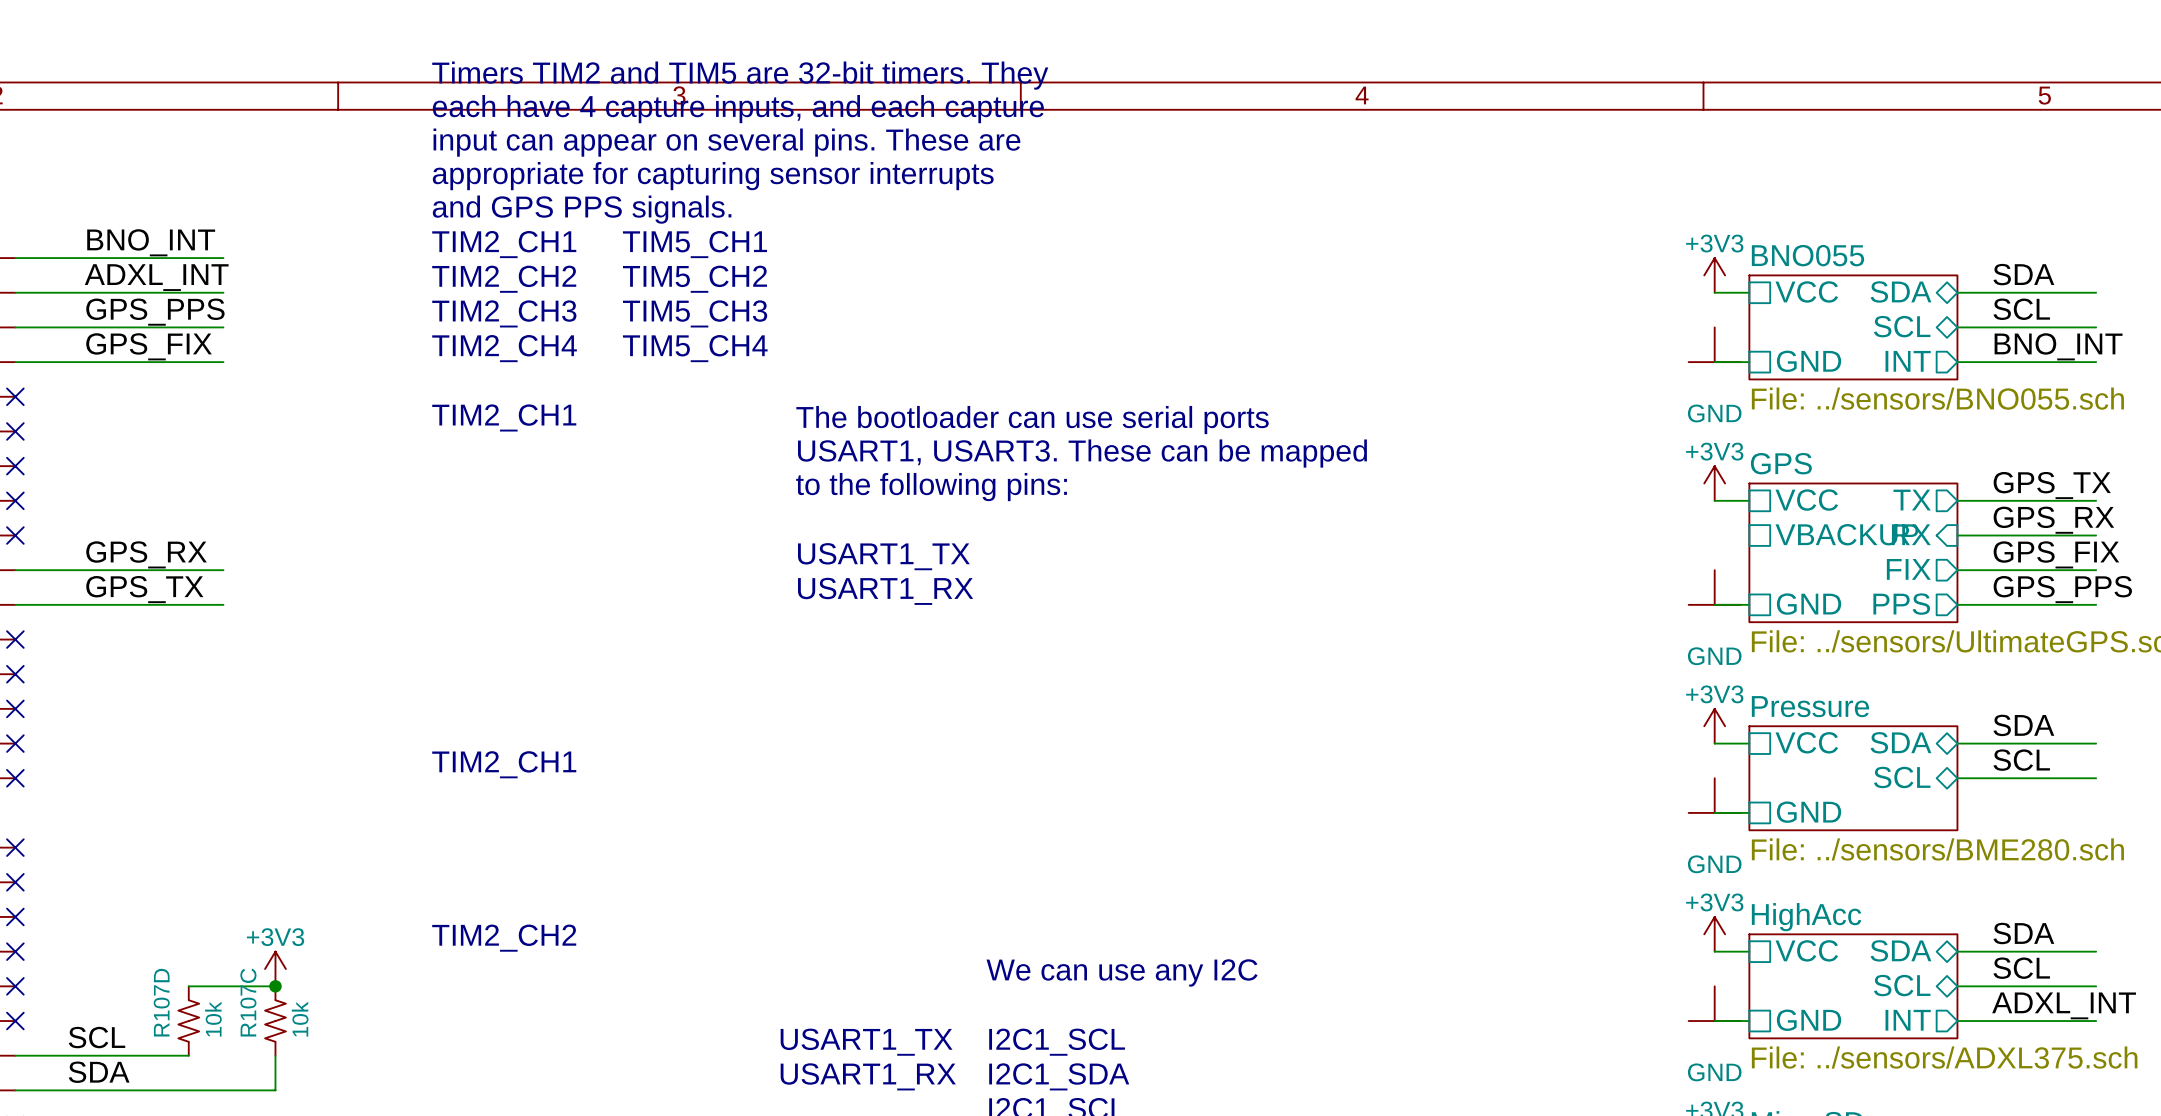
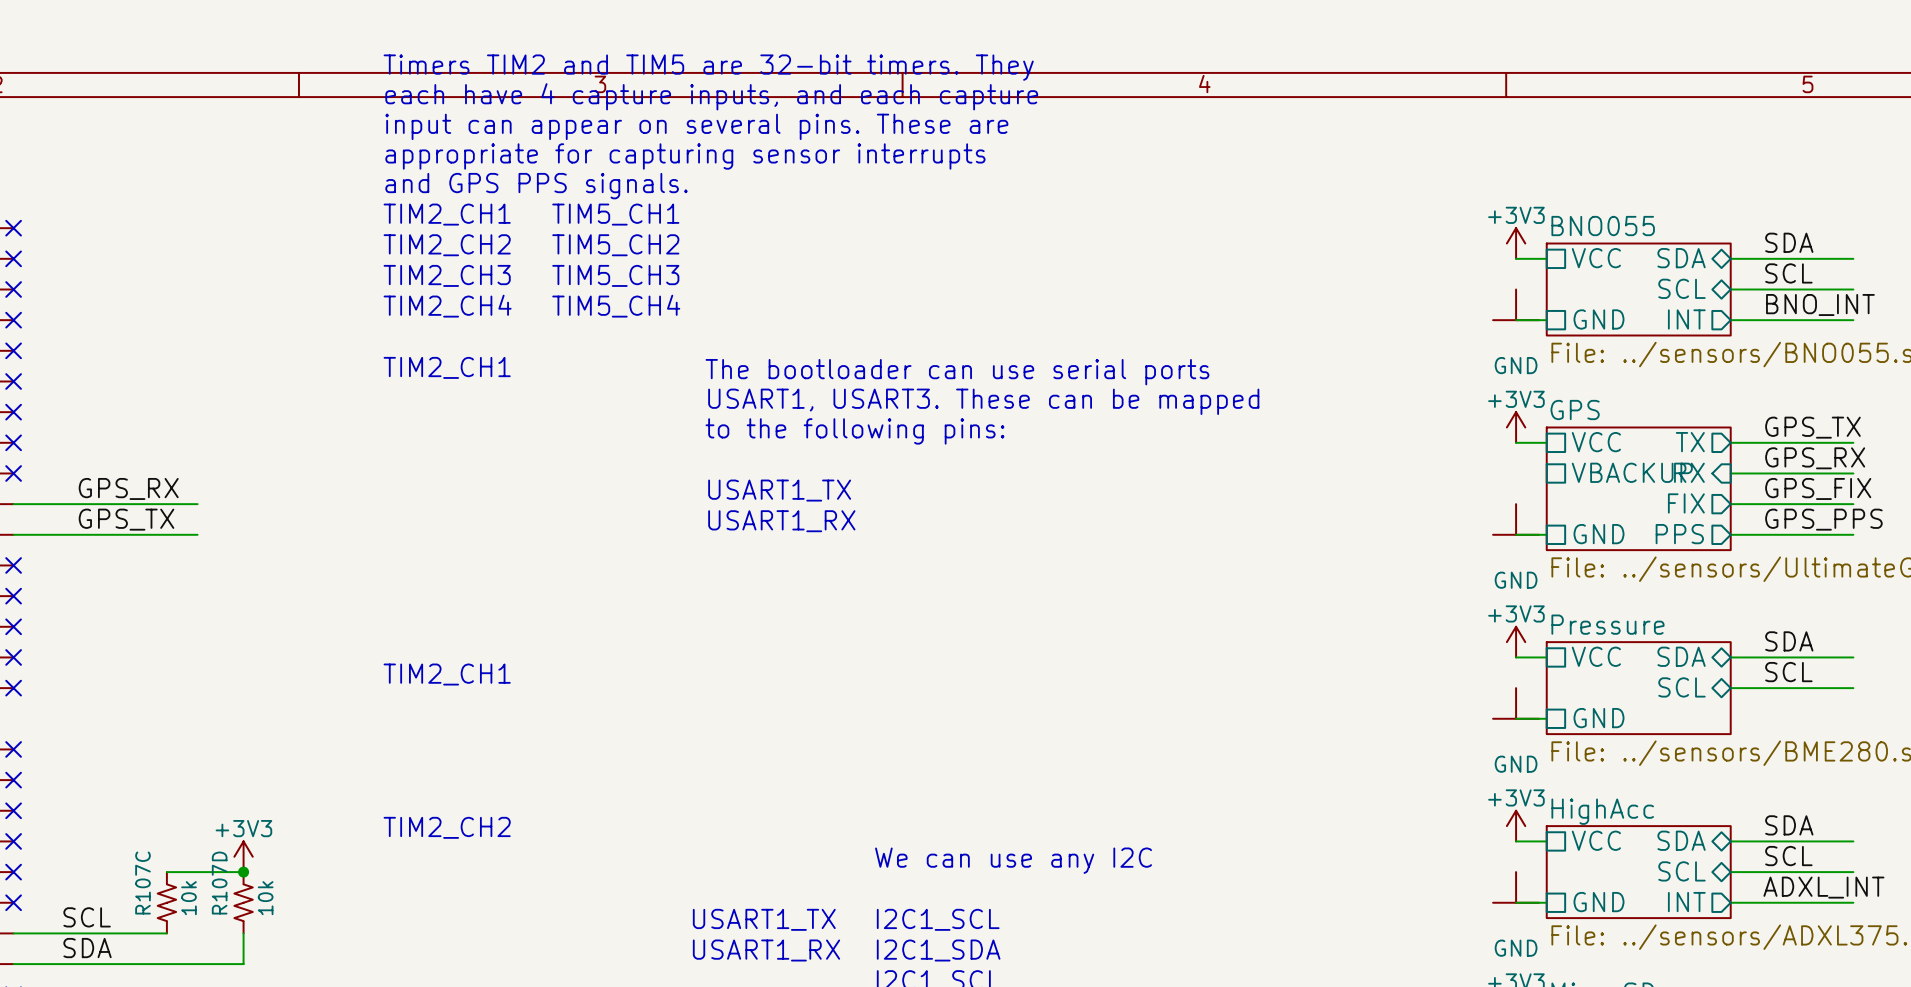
label: BNO_INT (151, 242) -> none
wire: (15, 258) (223, 258) -> none
no-connect mark: none -> (13, 228)
label: ADXL_INT (156, 277) -> none
wire: (15, 292) (223, 292) -> none
no-connect mark: none -> (13, 258)
label: GPS_PPS (155, 312) -> none
wire: (15, 327) (223, 327) -> none
no-connect mark: none -> (13, 289)
label: GPS_FIX (149, 346) -> none
wire: (15, 362) (223, 362) -> none
no-connect mark: none -> (13, 320)
R107D name: R107D (161, 1002) -> R107C (142, 883)
R107C name: R107C (248, 1002) -> R107D (219, 883)

